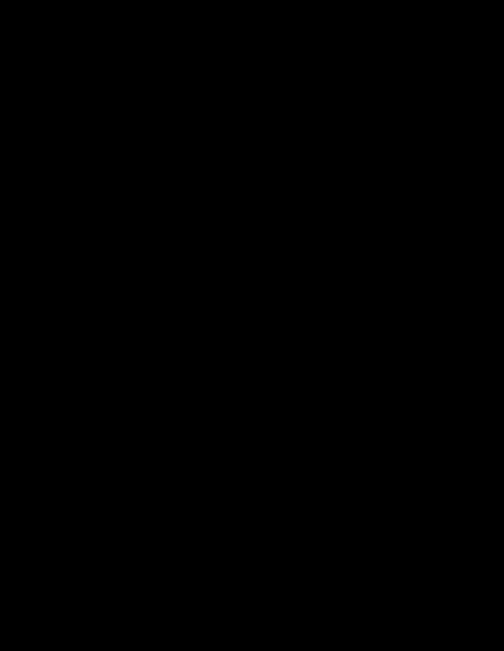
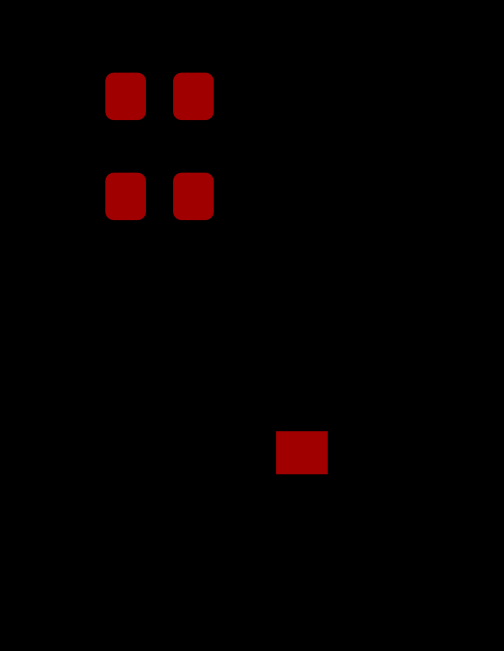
part: none -> (159, 96)
part: none -> (159, 196)
part: none -> (301, 452)

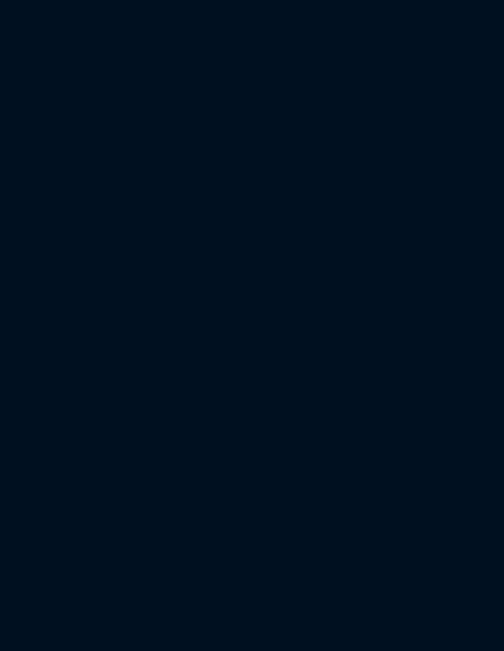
part: (159, 96) -> none
part: (159, 196) -> none
part: (301, 452) -> none

